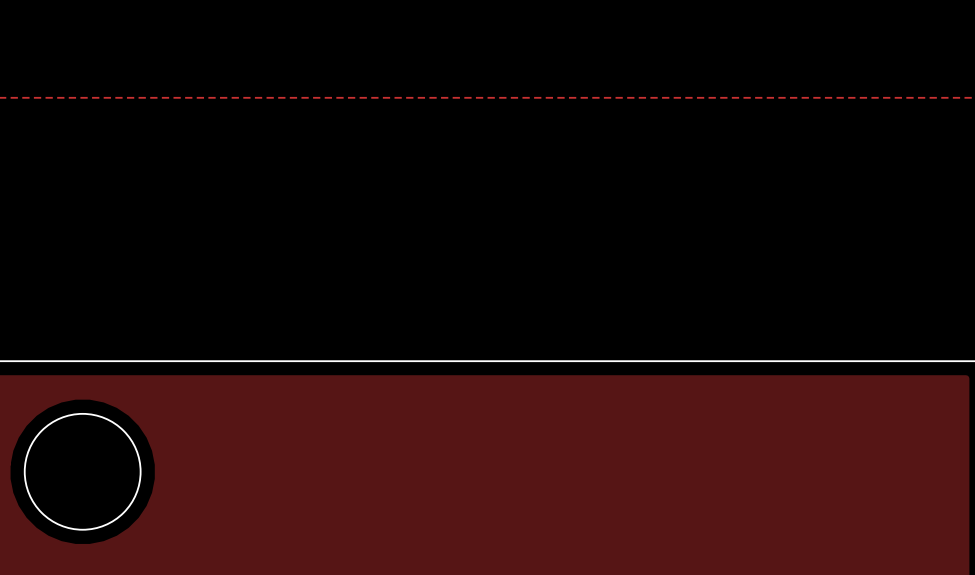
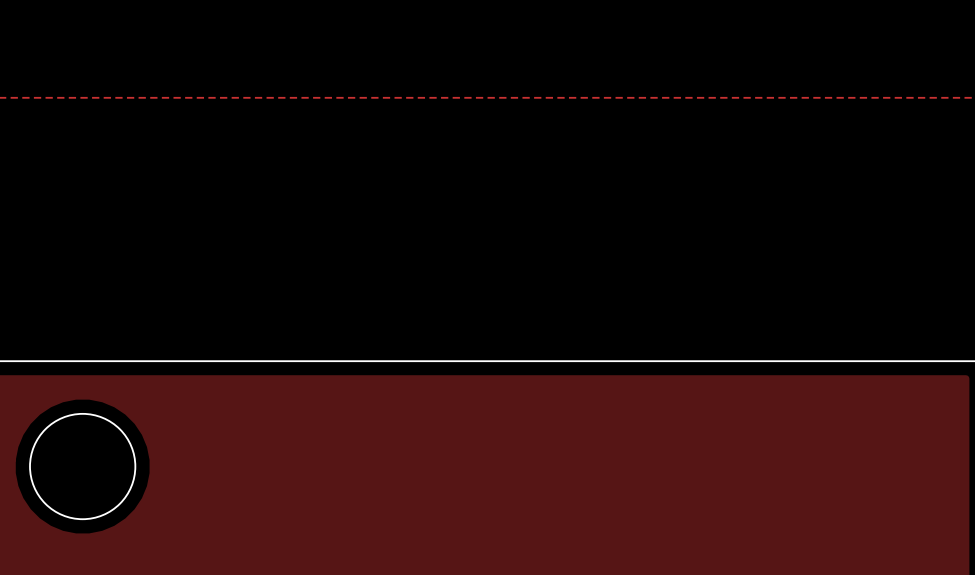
round board edge size: [24, 413, 142, 531] -> [29, 413, 137, 520]

